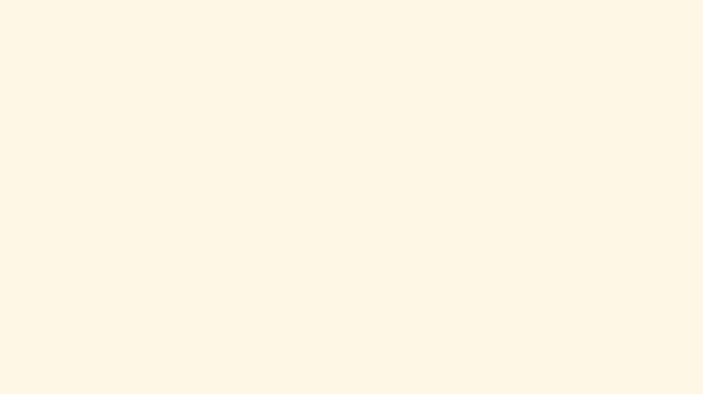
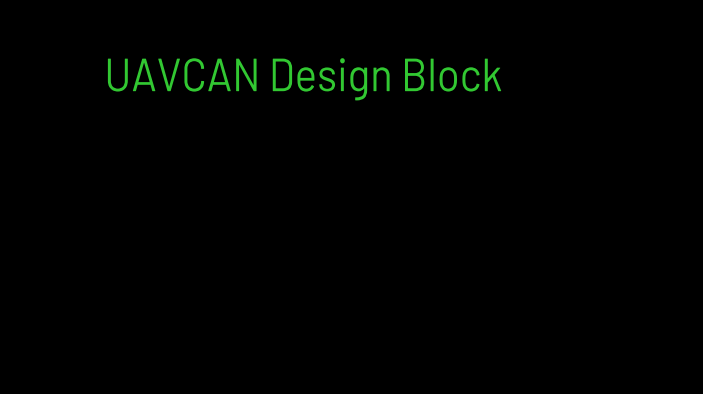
text: none -> UAVCAN Design Block (304, 79)

